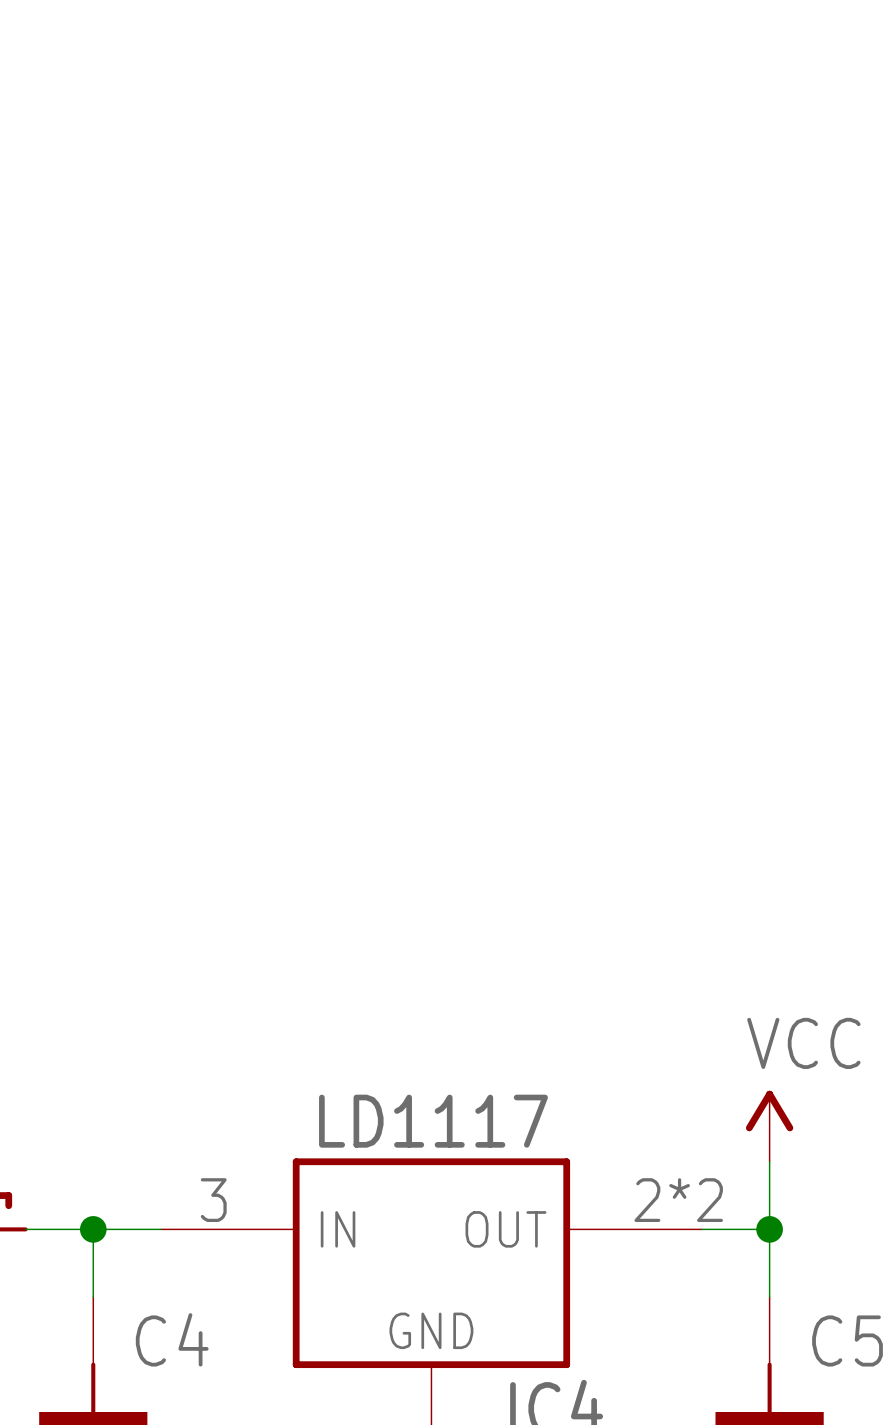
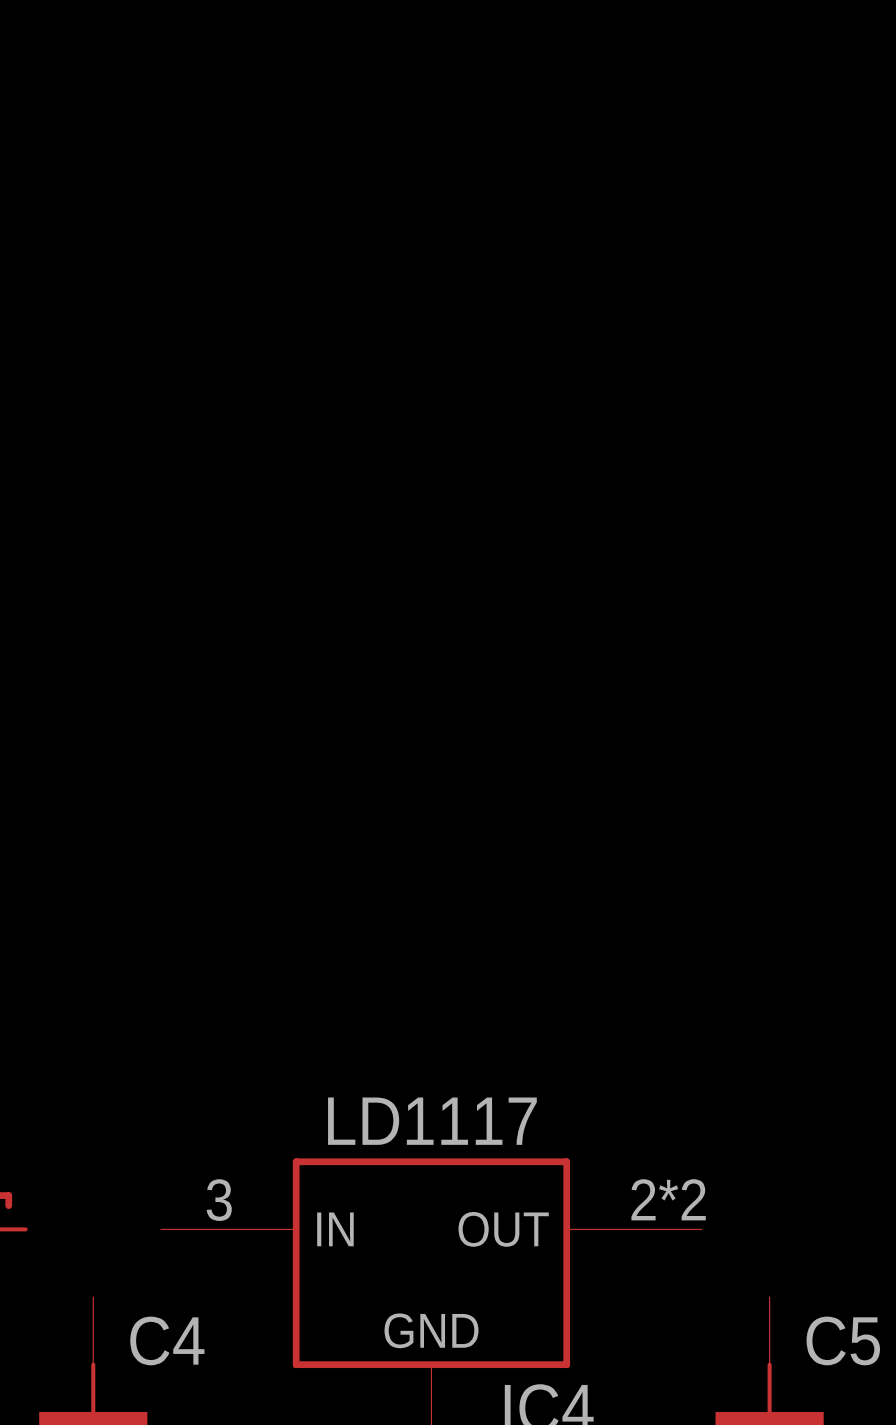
power symbol: VCC (769, 1126) -> none
wire: (769, 1161) (769, 1297) -> none
wire: (25, 1229) (160, 1229) -> none
wire: (93, 1229) (93, 1297) -> none
junction: (93, 1229) -> none
wire: (701, 1229) (769, 1229) -> none
junction: (769, 1229) -> none

